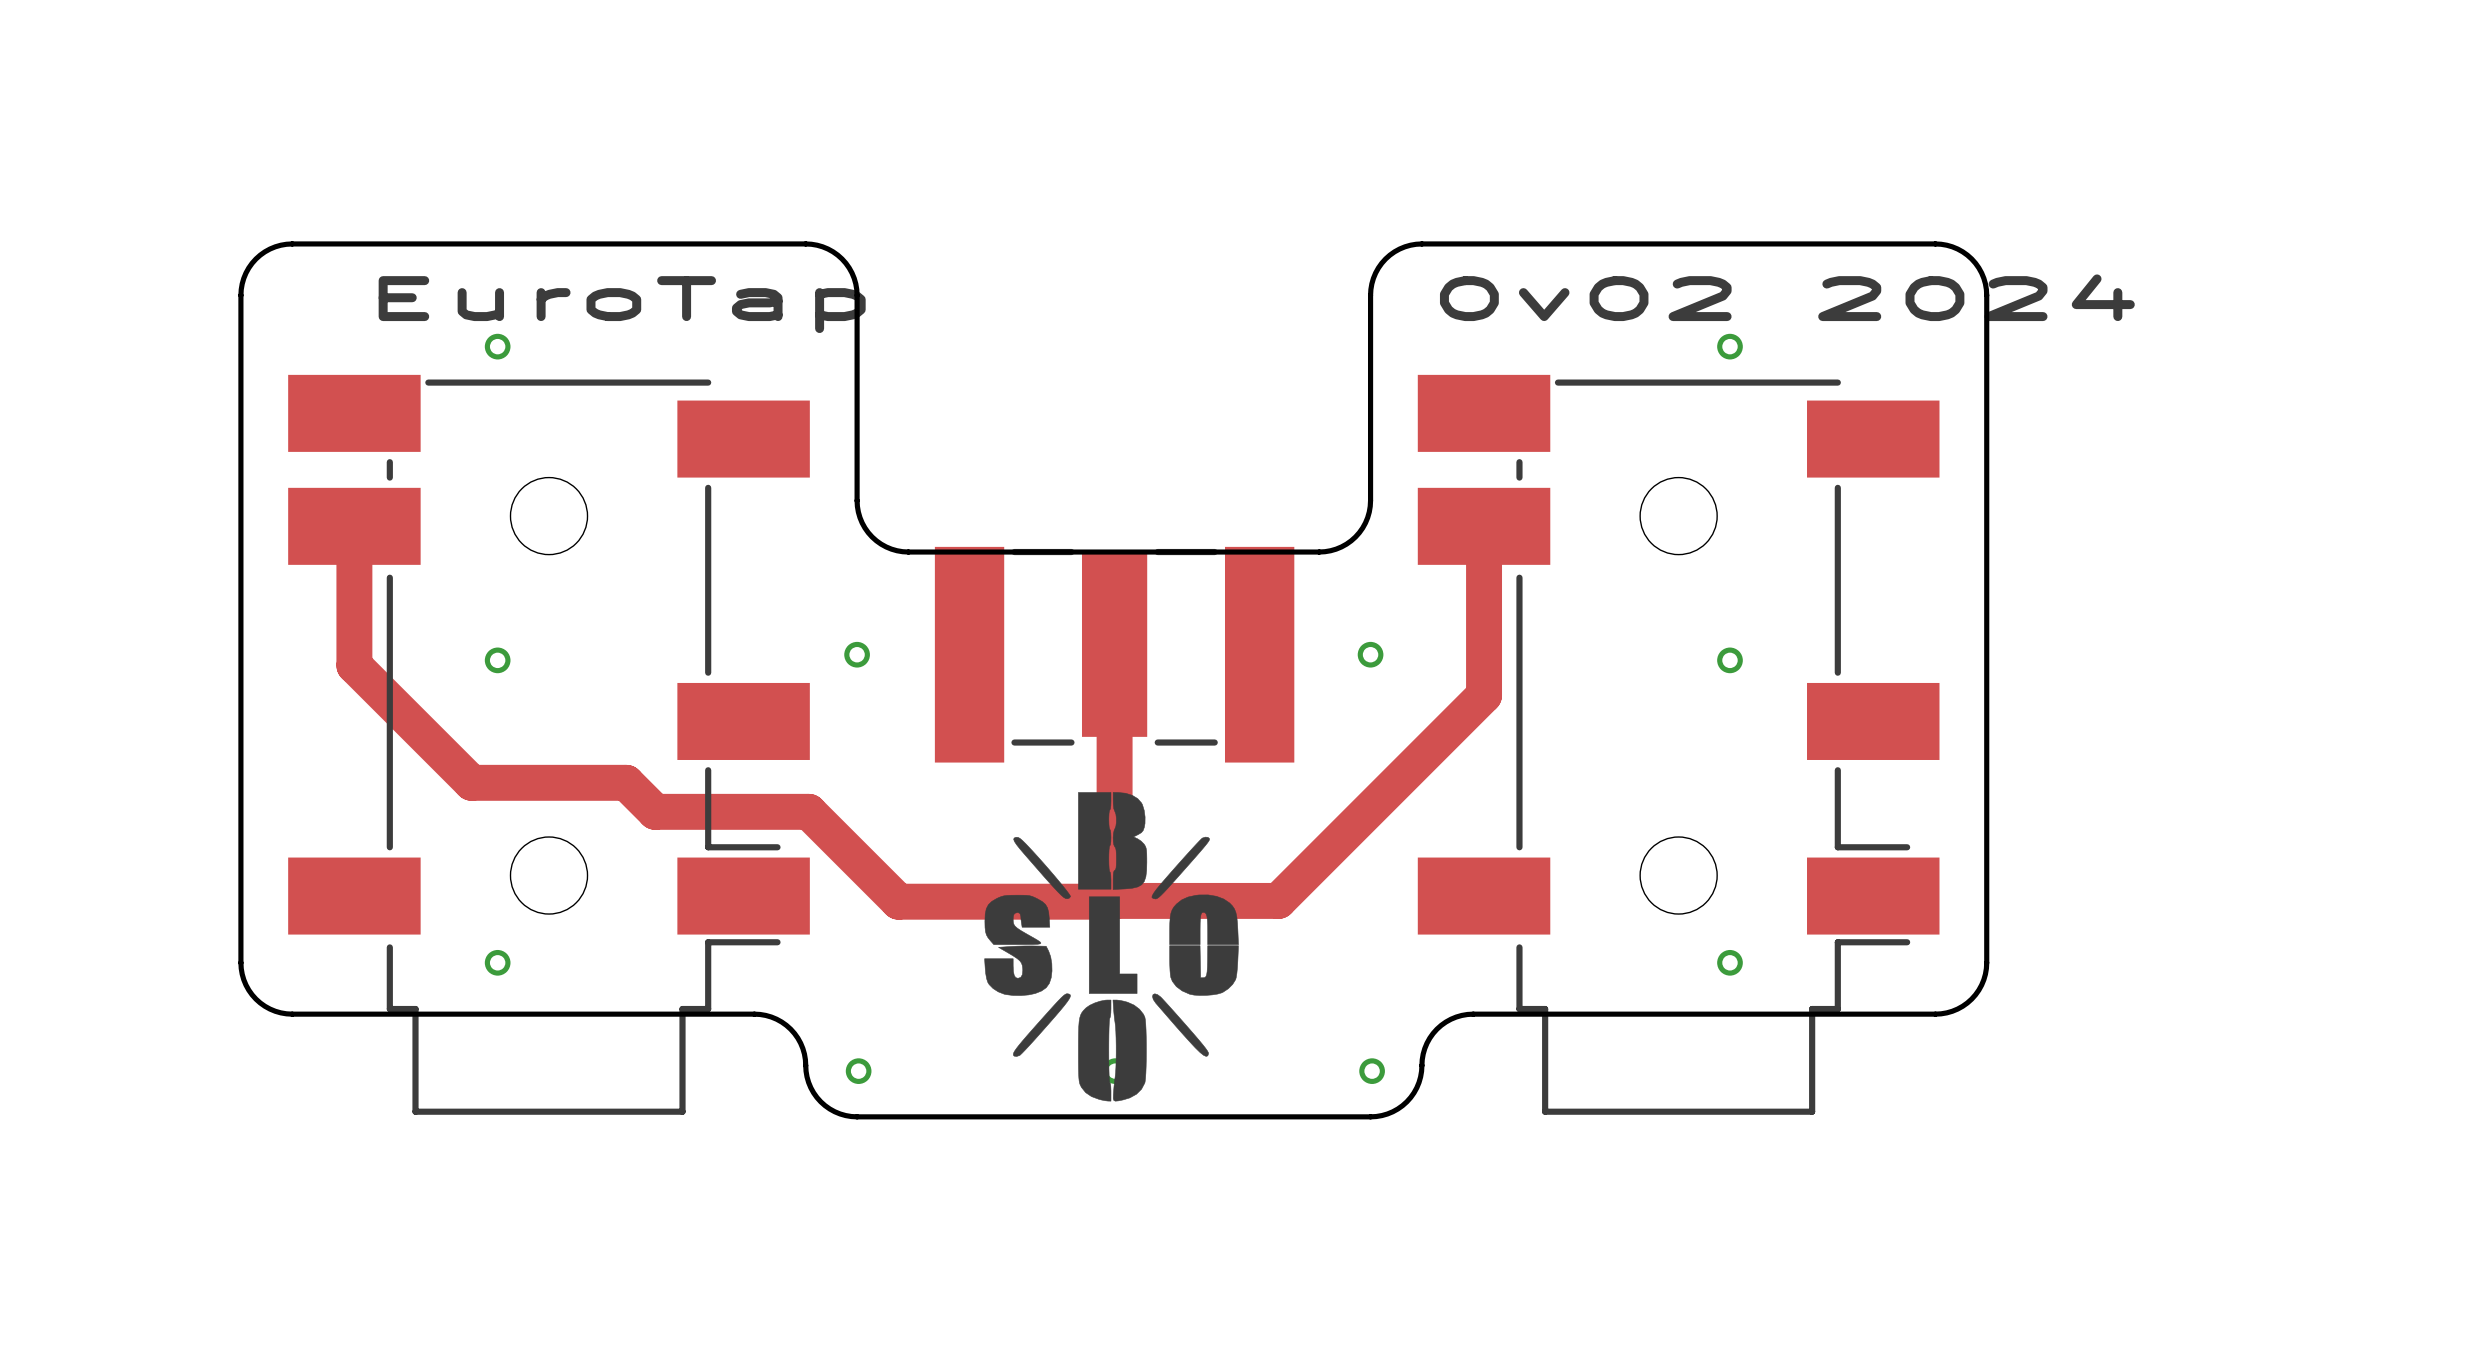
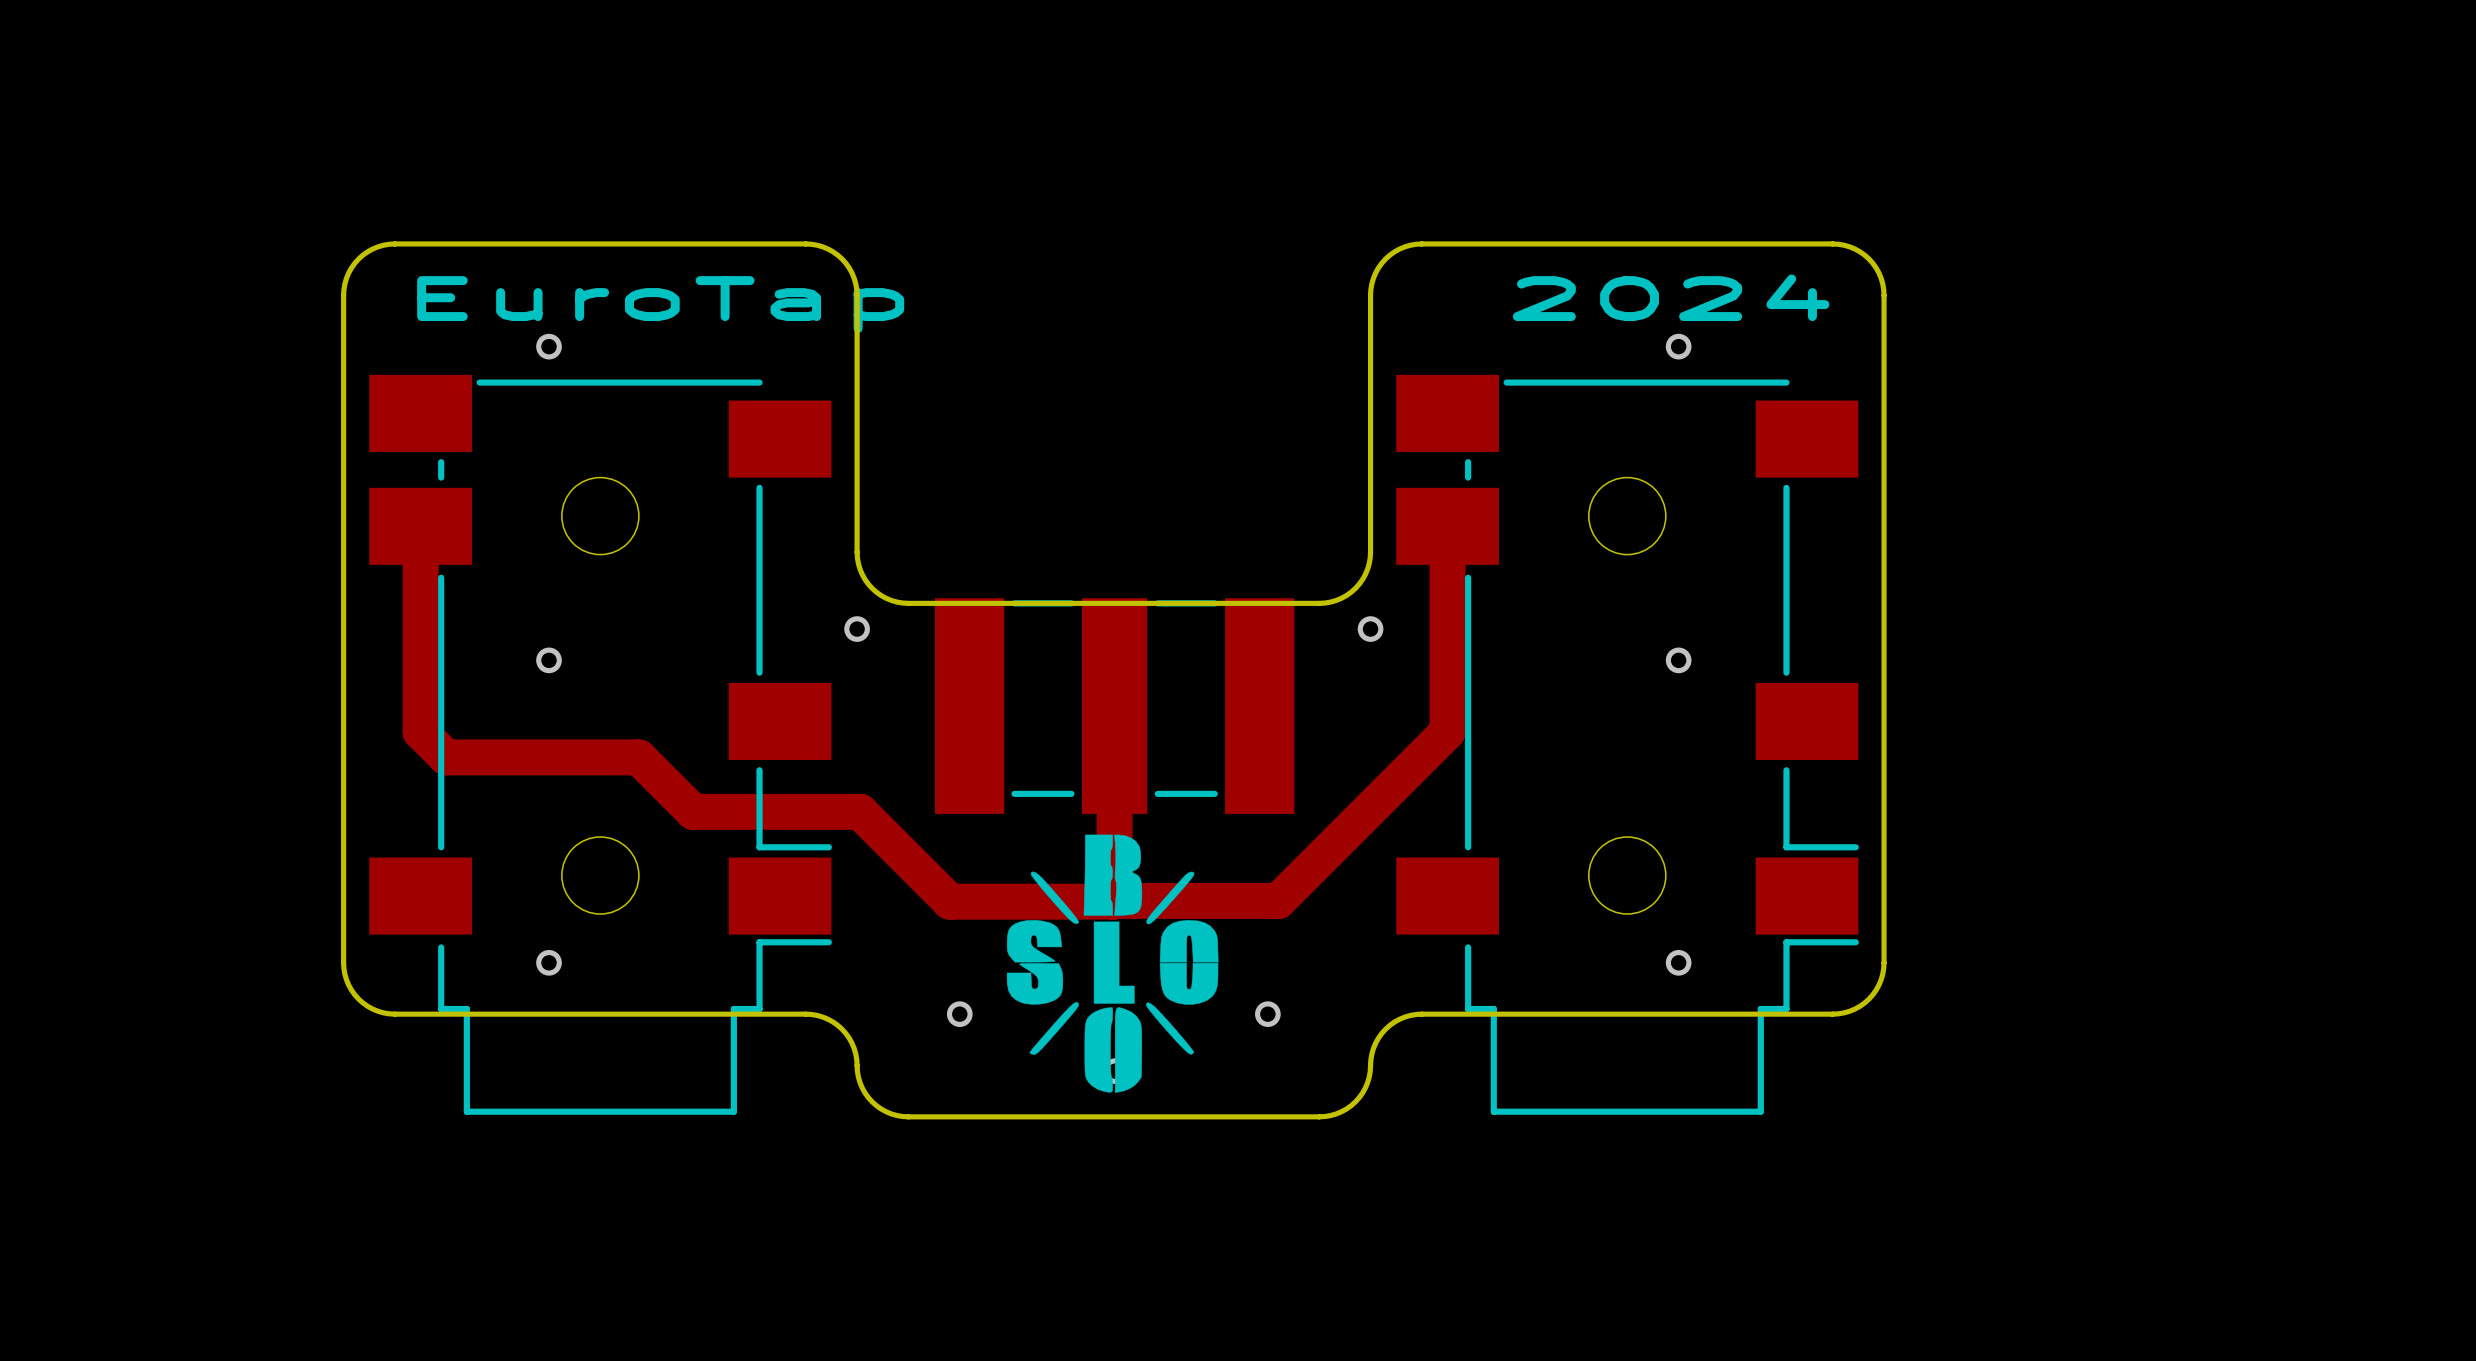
board edge: (394, 243) (292, 243) (275, 246) (260, 255) (248, 267) (242, 283) (240, 295) (242, 974) (248, 990) (255, 999) (269, 1009) (280, 1012) (394, 1014) -> (394, 243) (378, 246) (358, 258) (348, 273) (343, 295) (343, 968) (348, 985) (362, 1002) (378, 1011) (394, 1014)
board edge: (1832, 243) (1935, 243) (1952, 246) (1962, 251) (1975, 263) (1983, 278) (1986, 295) (1985, 974) (1981, 985) (1971, 999) (1962, 1006) (1946, 1012) (1832, 1014) -> (1832, 243) (1849, 246) (1868, 258) (1881, 278) (1884, 295) (1883, 968) (1878, 985) (1868, 999) (1854, 1009) (1832, 1014)
text: 0v02 2024 (1787, 297) -> 2024 (1671, 297)
text position: EuroTap (622, 304) -> EuroTap (660, 304)
via position: (497, 346) -> (549, 346)
via position: (1729, 346) -> (1678, 346)
part footprint: [1417, 374, 1940, 1115] -> [1396, 374, 1859, 1115]
board edge: (857, 500) (859, 517) (872, 536) (891, 549) (908, 552) (1324, 551) (1341, 546) (1355, 536) (1365, 522) (1370, 500) -> (857, 500) (857, 557) (862, 574) (868, 584) (881, 595) (891, 600) (908, 603) (1330, 602) (1351, 592) (1362, 579) (1367, 568) (1370, 552) (1370, 500)
track: (354, 526) (354, 665) (420, 731) -> (420, 526) (420, 731)
track: (1484, 526) (1484, 695) (1447, 731) -> (1447, 526) (1447, 731)
part footprint: [934, 546, 1295, 763] -> [934, 598, 1295, 814]
via position: (857, 654) -> (857, 629)
via position: (1370, 654) -> (1370, 629)
via position: (497, 660) -> (549, 660)
via position: (1729, 660) -> (1678, 660)
part: (549, 744) -> none
part: none -> (600, 744)
track: (446, 757) (471, 782) (626, 782) (655, 811) (693, 811) -> (446, 757) (638, 757) (693, 811)
drawing shape: [984, 792, 1239, 1102] -> [1006, 834, 1219, 1093]
track: (808, 811) (898, 901) (950, 901) -> (808, 811) (860, 811) (950, 901)
via position: (497, 962) -> (549, 962)
via position: (1729, 962) -> (1678, 962)
board edge: (754, 1014) (776, 1019) (794, 1033) (802, 1048) (807, 1076) (810, 1087) (816, 1097) (829, 1108) (851, 1116) (908, 1116) -> (754, 1014) (811, 1014) (833, 1022) (842, 1029) (852, 1043) (855, 1054) (859, 1082) (868, 1097) (886, 1111) (908, 1116)
board edge: (1473, 1014) (1450, 1019) (1433, 1033) (1424, 1048) (1420, 1076) (1416, 1087) (1406, 1101) (1397, 1108) (1376, 1116) (1319, 1116) -> (1473, 1014) (1416, 1014) (1394, 1022) (1385, 1029) (1375, 1043) (1371, 1054) (1367, 1082) (1359, 1097) (1341, 1111) (1319, 1116)
via position: (858, 1071) -> (959, 1014)
via position: (1372, 1071) -> (1267, 1014)

